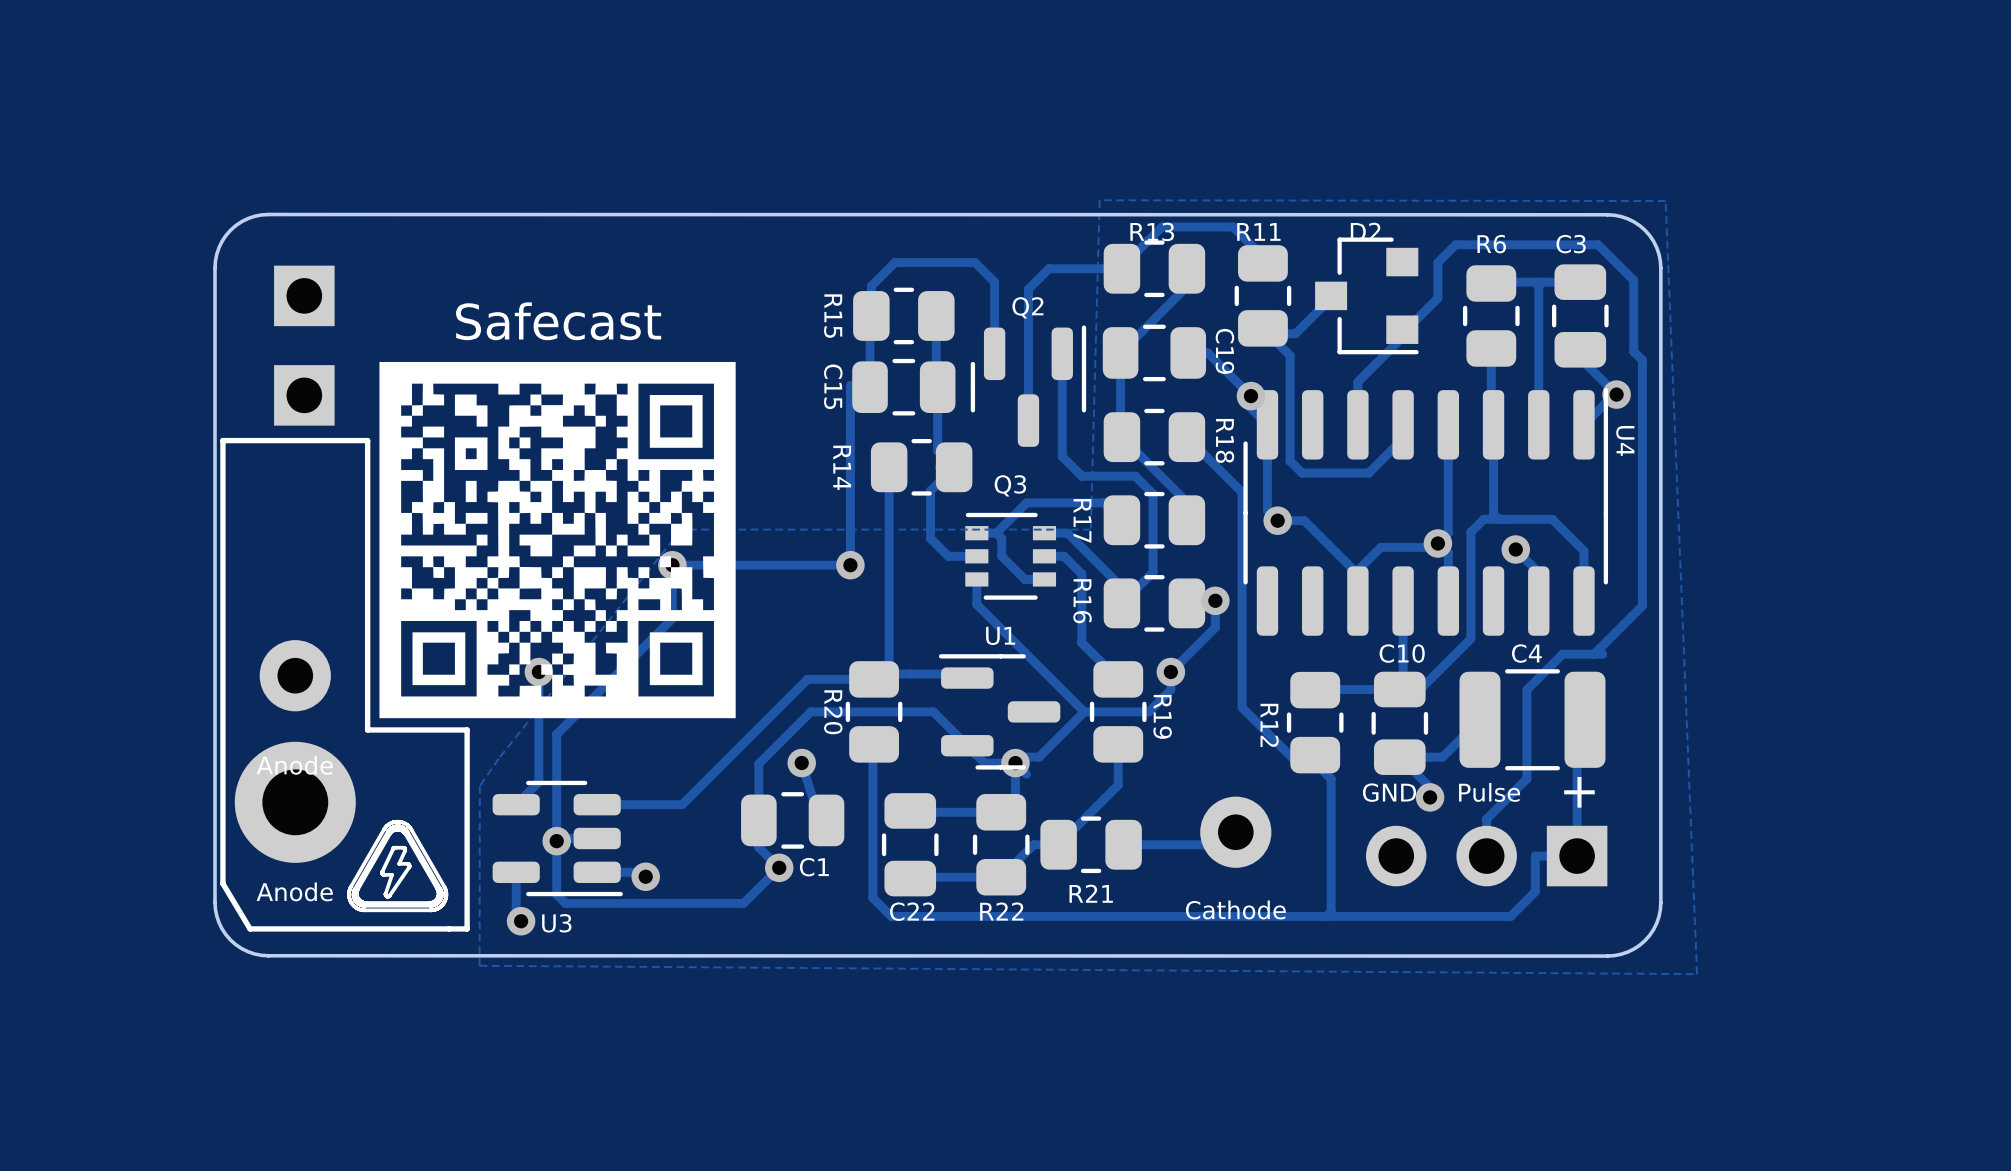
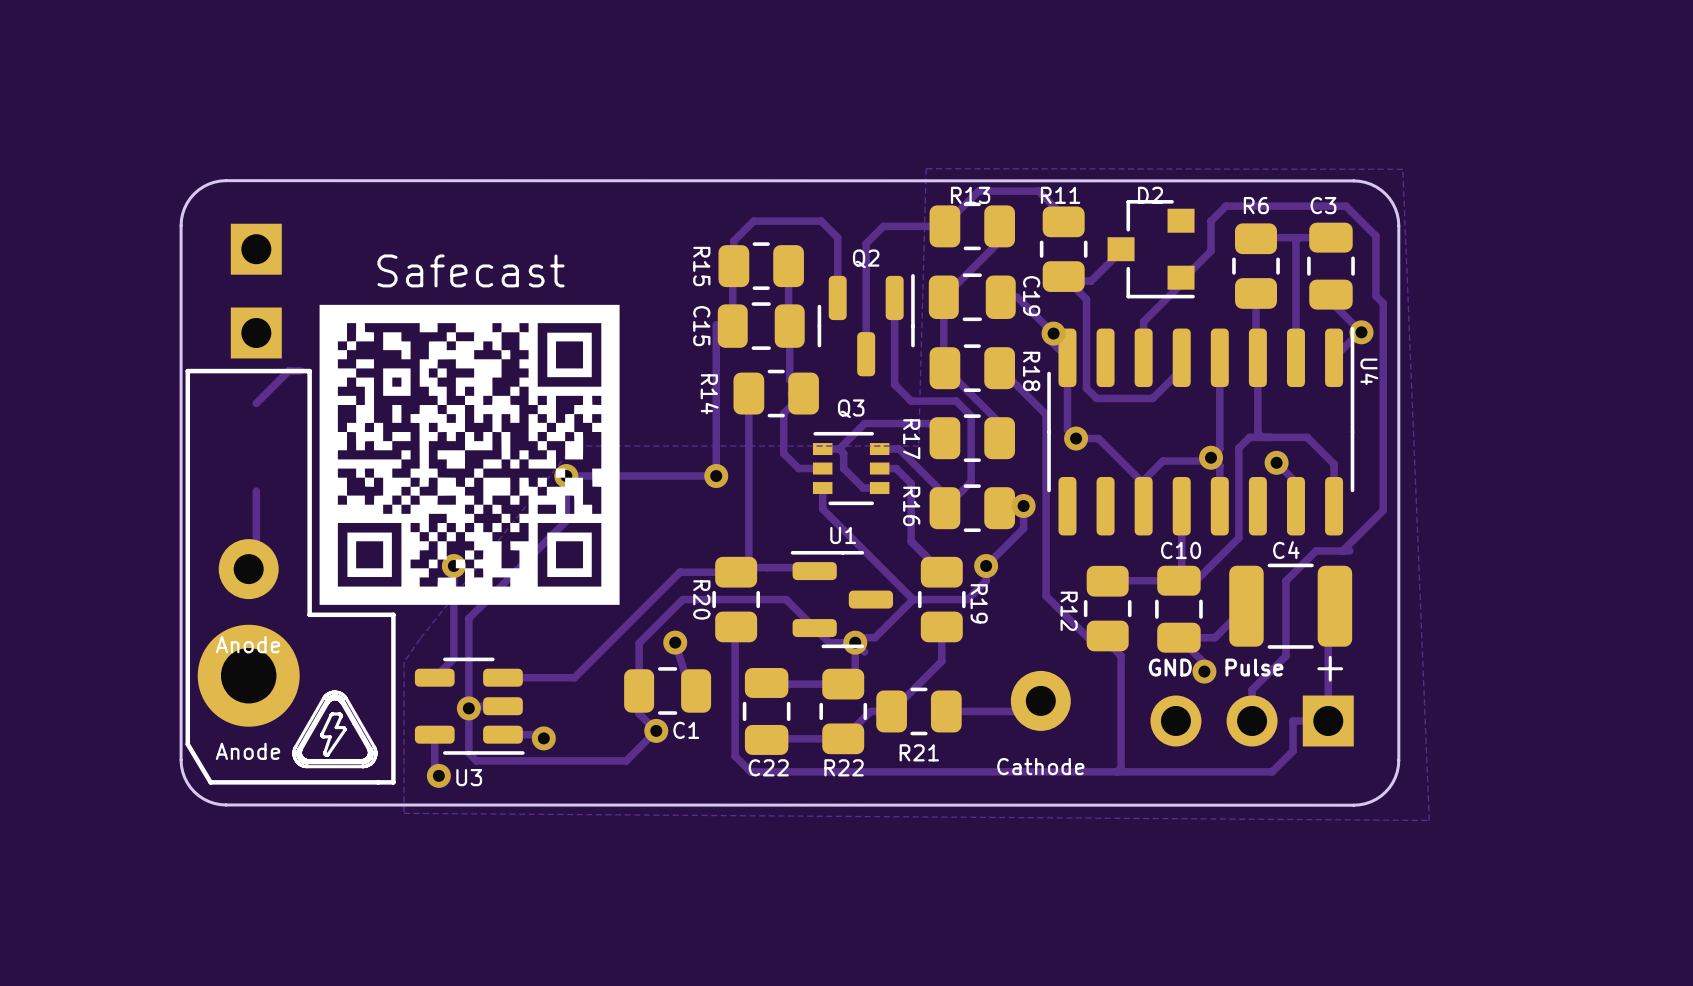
track: none -> (300, 370) (288, 370) (256, 403)
track: none -> (256, 491) (256, 561)

